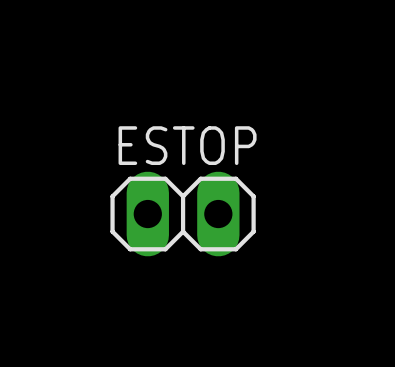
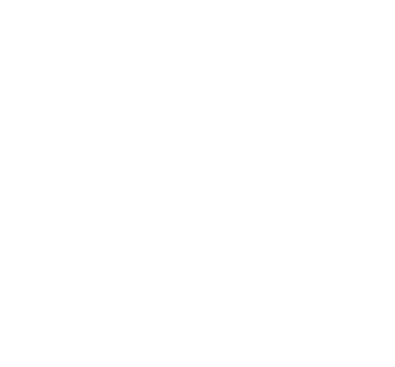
ESTOP: (183, 214) -> none

